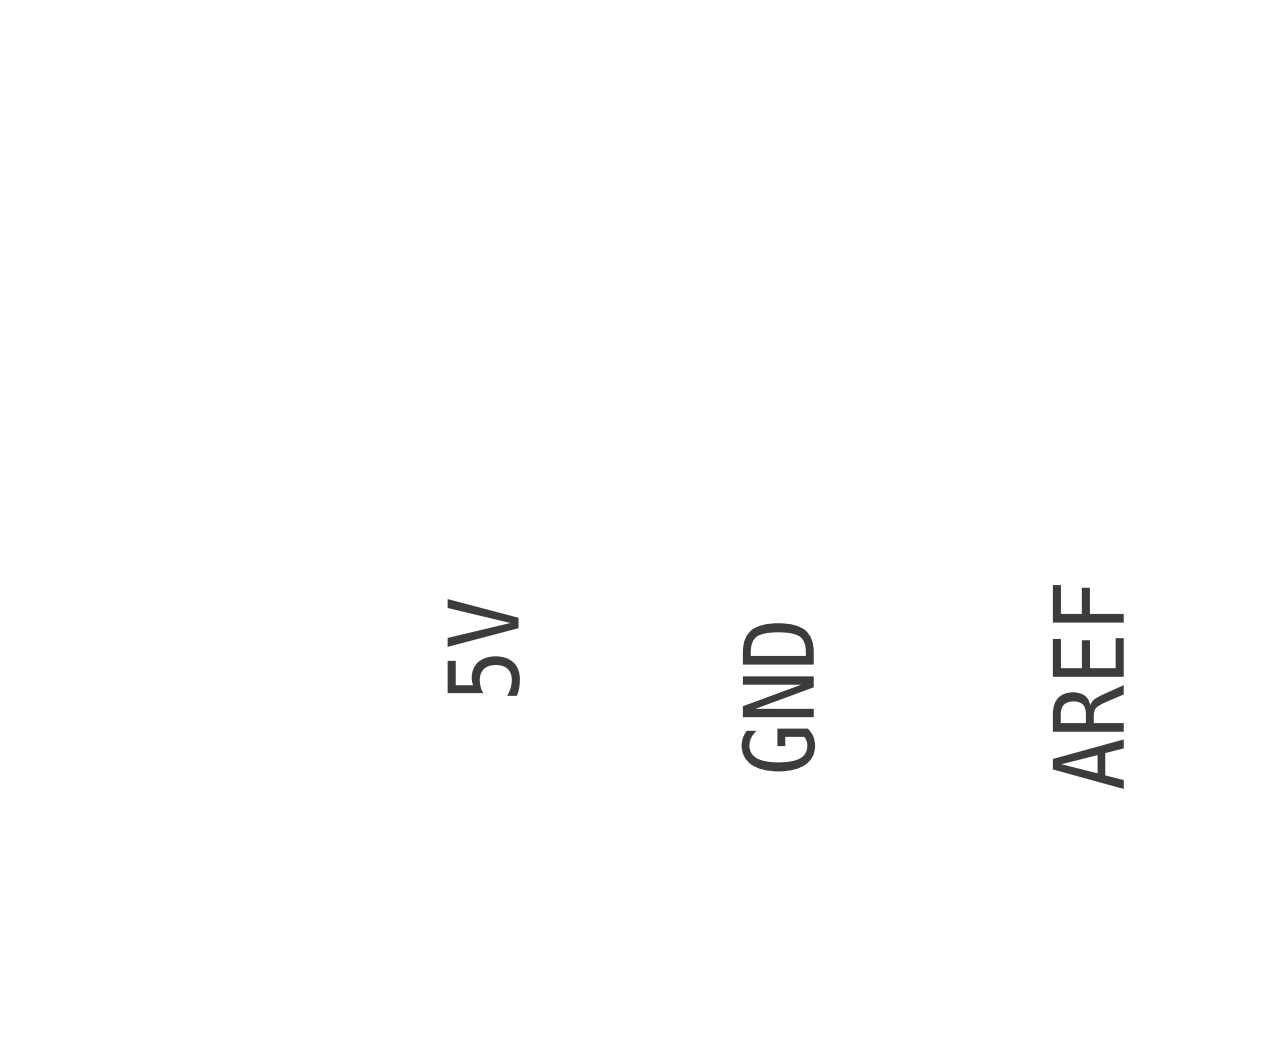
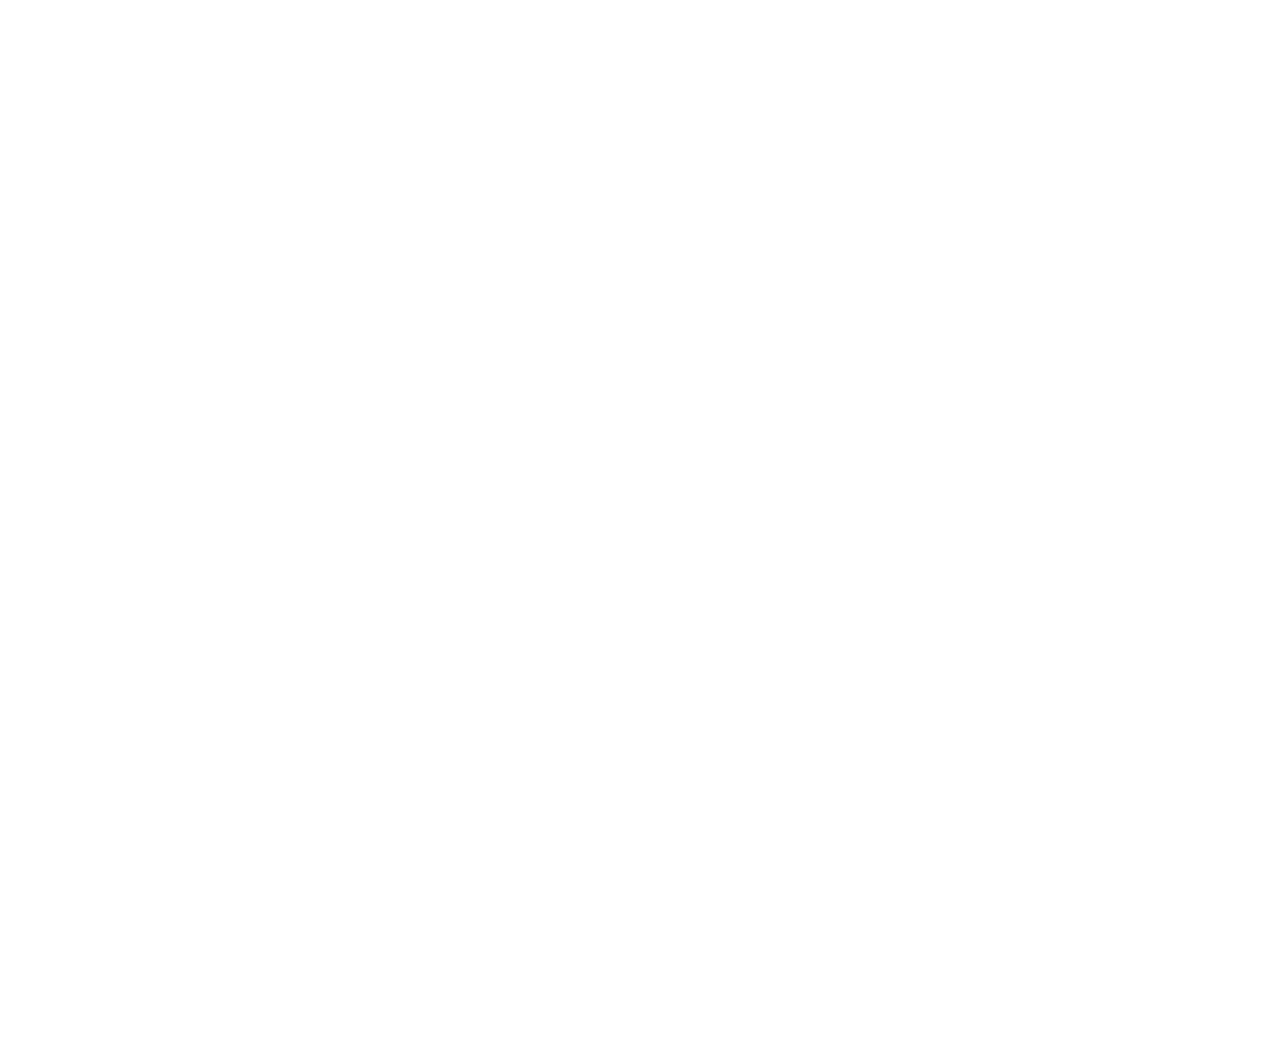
text: 5V (483, 647) -> none
text: AREF (1088, 687) -> none
text: GND (778, 697) -> none

